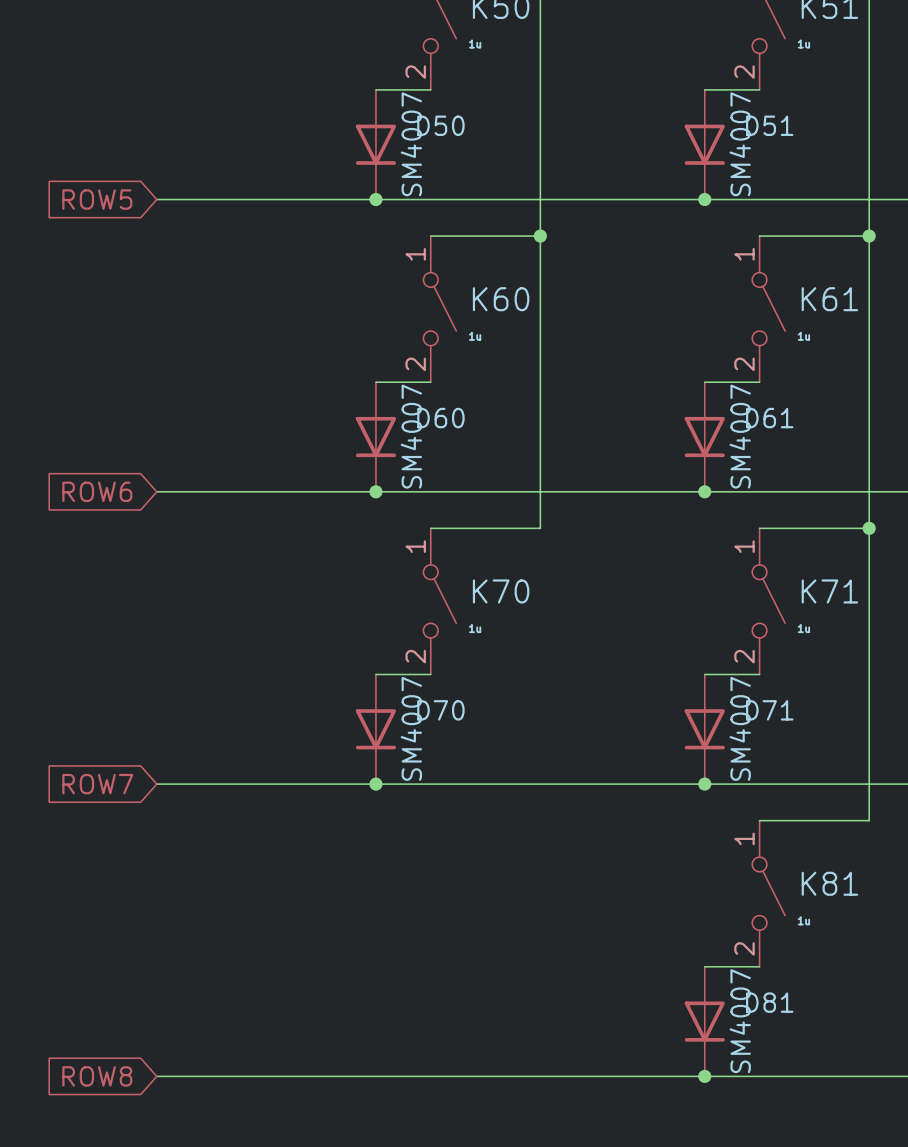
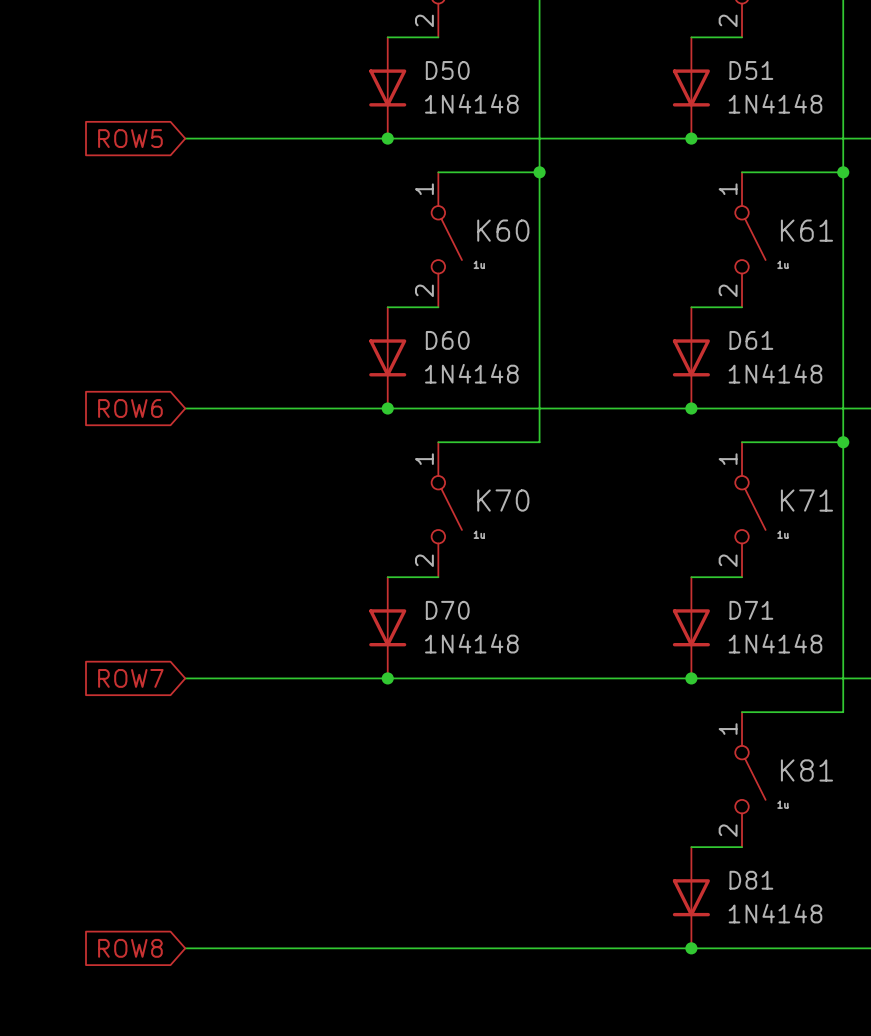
D50 value: SM4007 (411, 144) -> 1N4148 (471, 103)
D51 value: SM4007 (740, 144) -> 1N4148 (775, 103)
D60 value: SM4007 (411, 436) -> 1N4148 (471, 373)
D61 value: SM4007 (740, 436) -> 1N4148 (775, 373)
D70 value: SM4007 (411, 728) -> 1N4148 (471, 643)
D71 value: SM4007 (740, 728) -> 1N4148 (775, 643)
D81 value: SM4007 (740, 1021) -> 1N4148 (775, 913)

